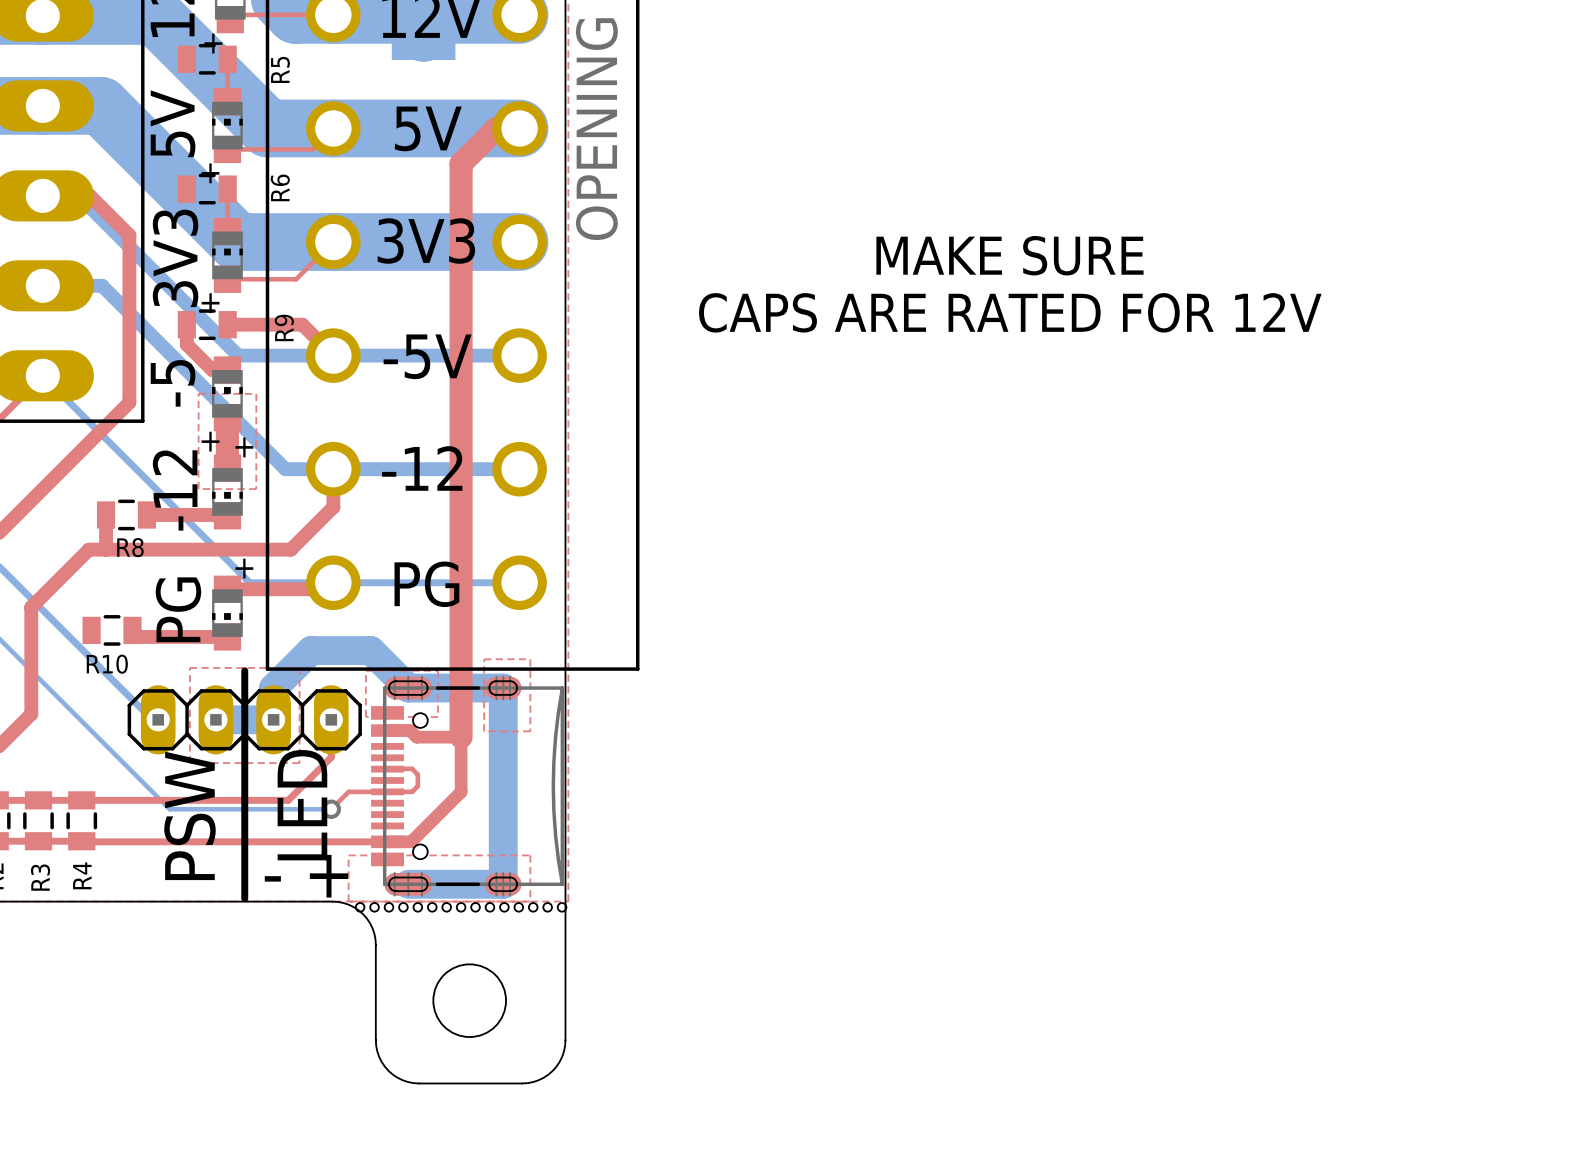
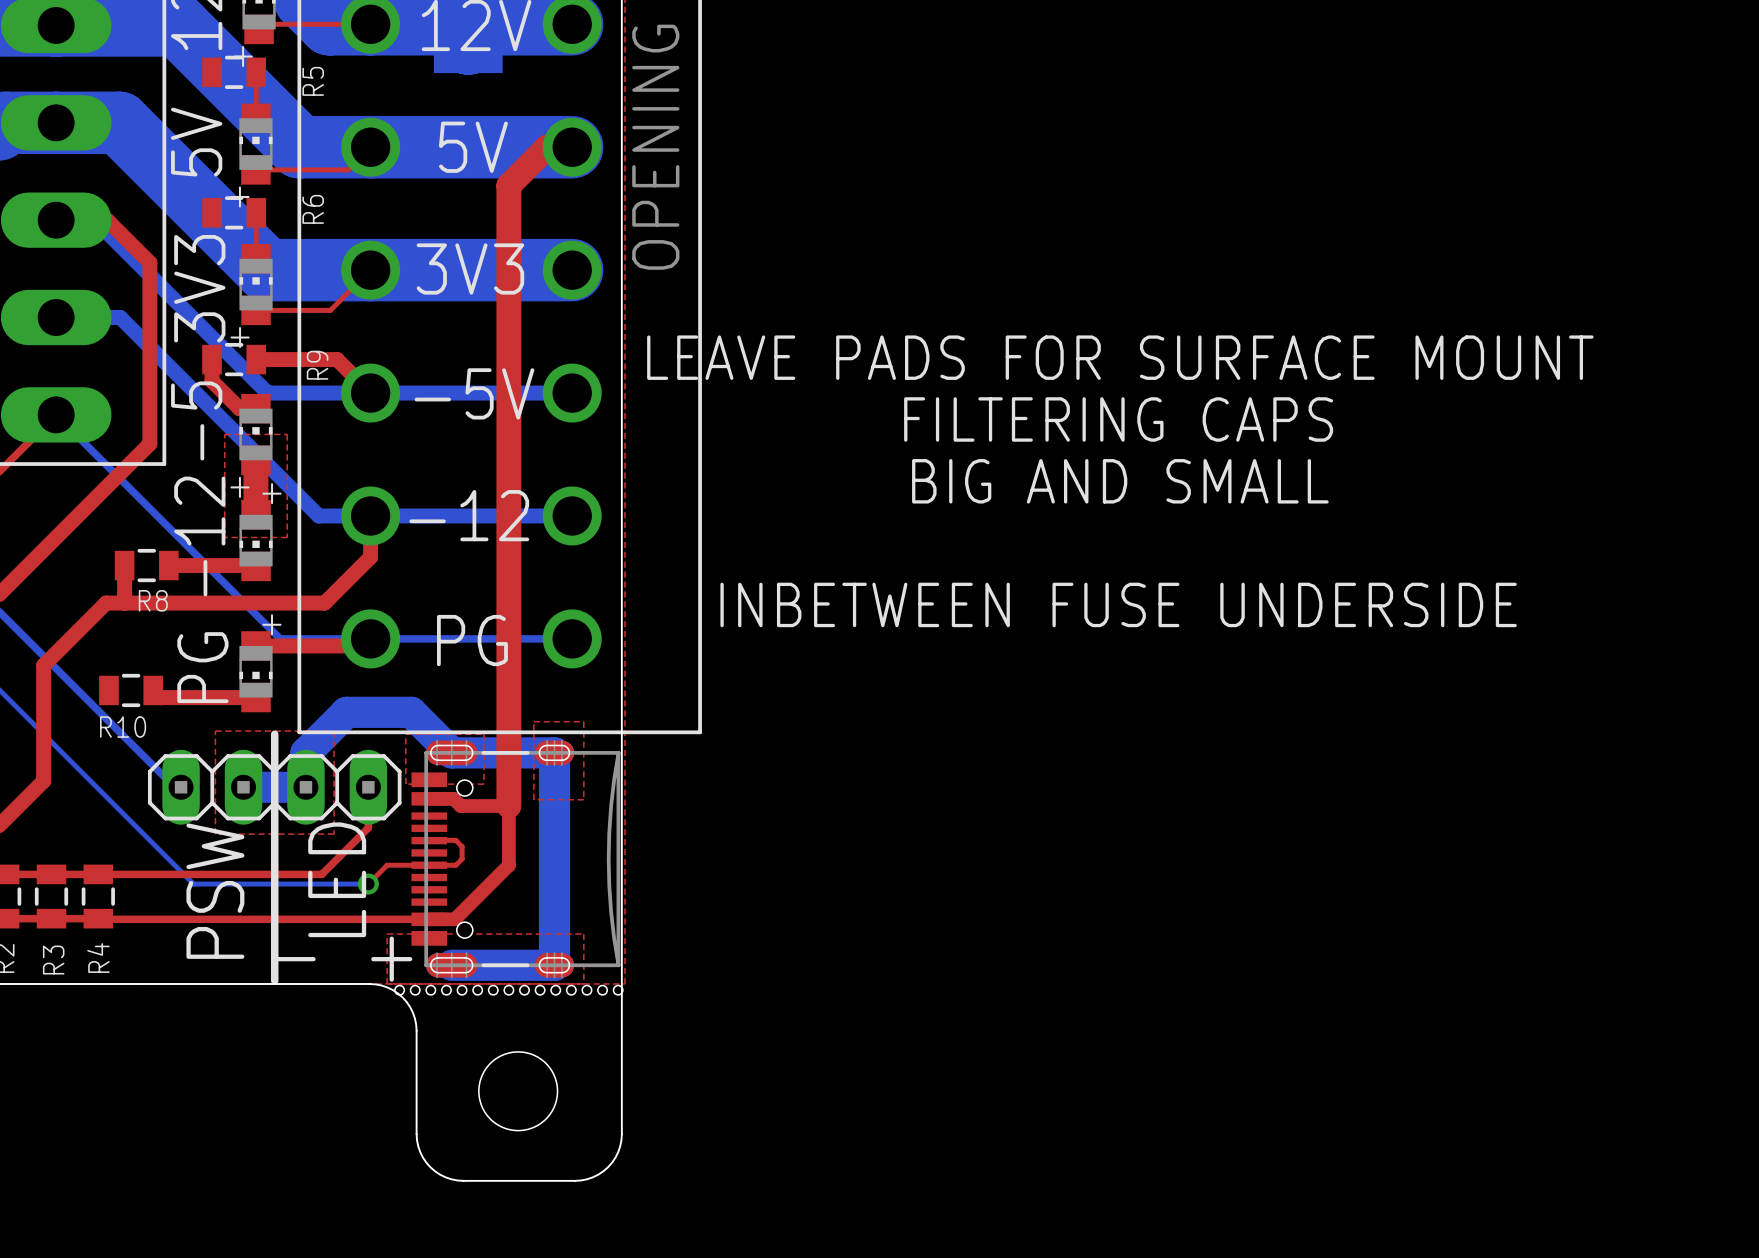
text: MAKE SURE (1009, 255) -> none
text: CAPS ARE RATED FOR 12V (1010, 312) -> LEAVE PADS FOR SURFACE MOUNT (1120, 357)
text: none -> FILTERING CAPS (1118, 419)
text: none -> BIG AND SMALL (1120, 481)
text: none -> INBETWEEN FUSE UNDERSIDE (1118, 604)

